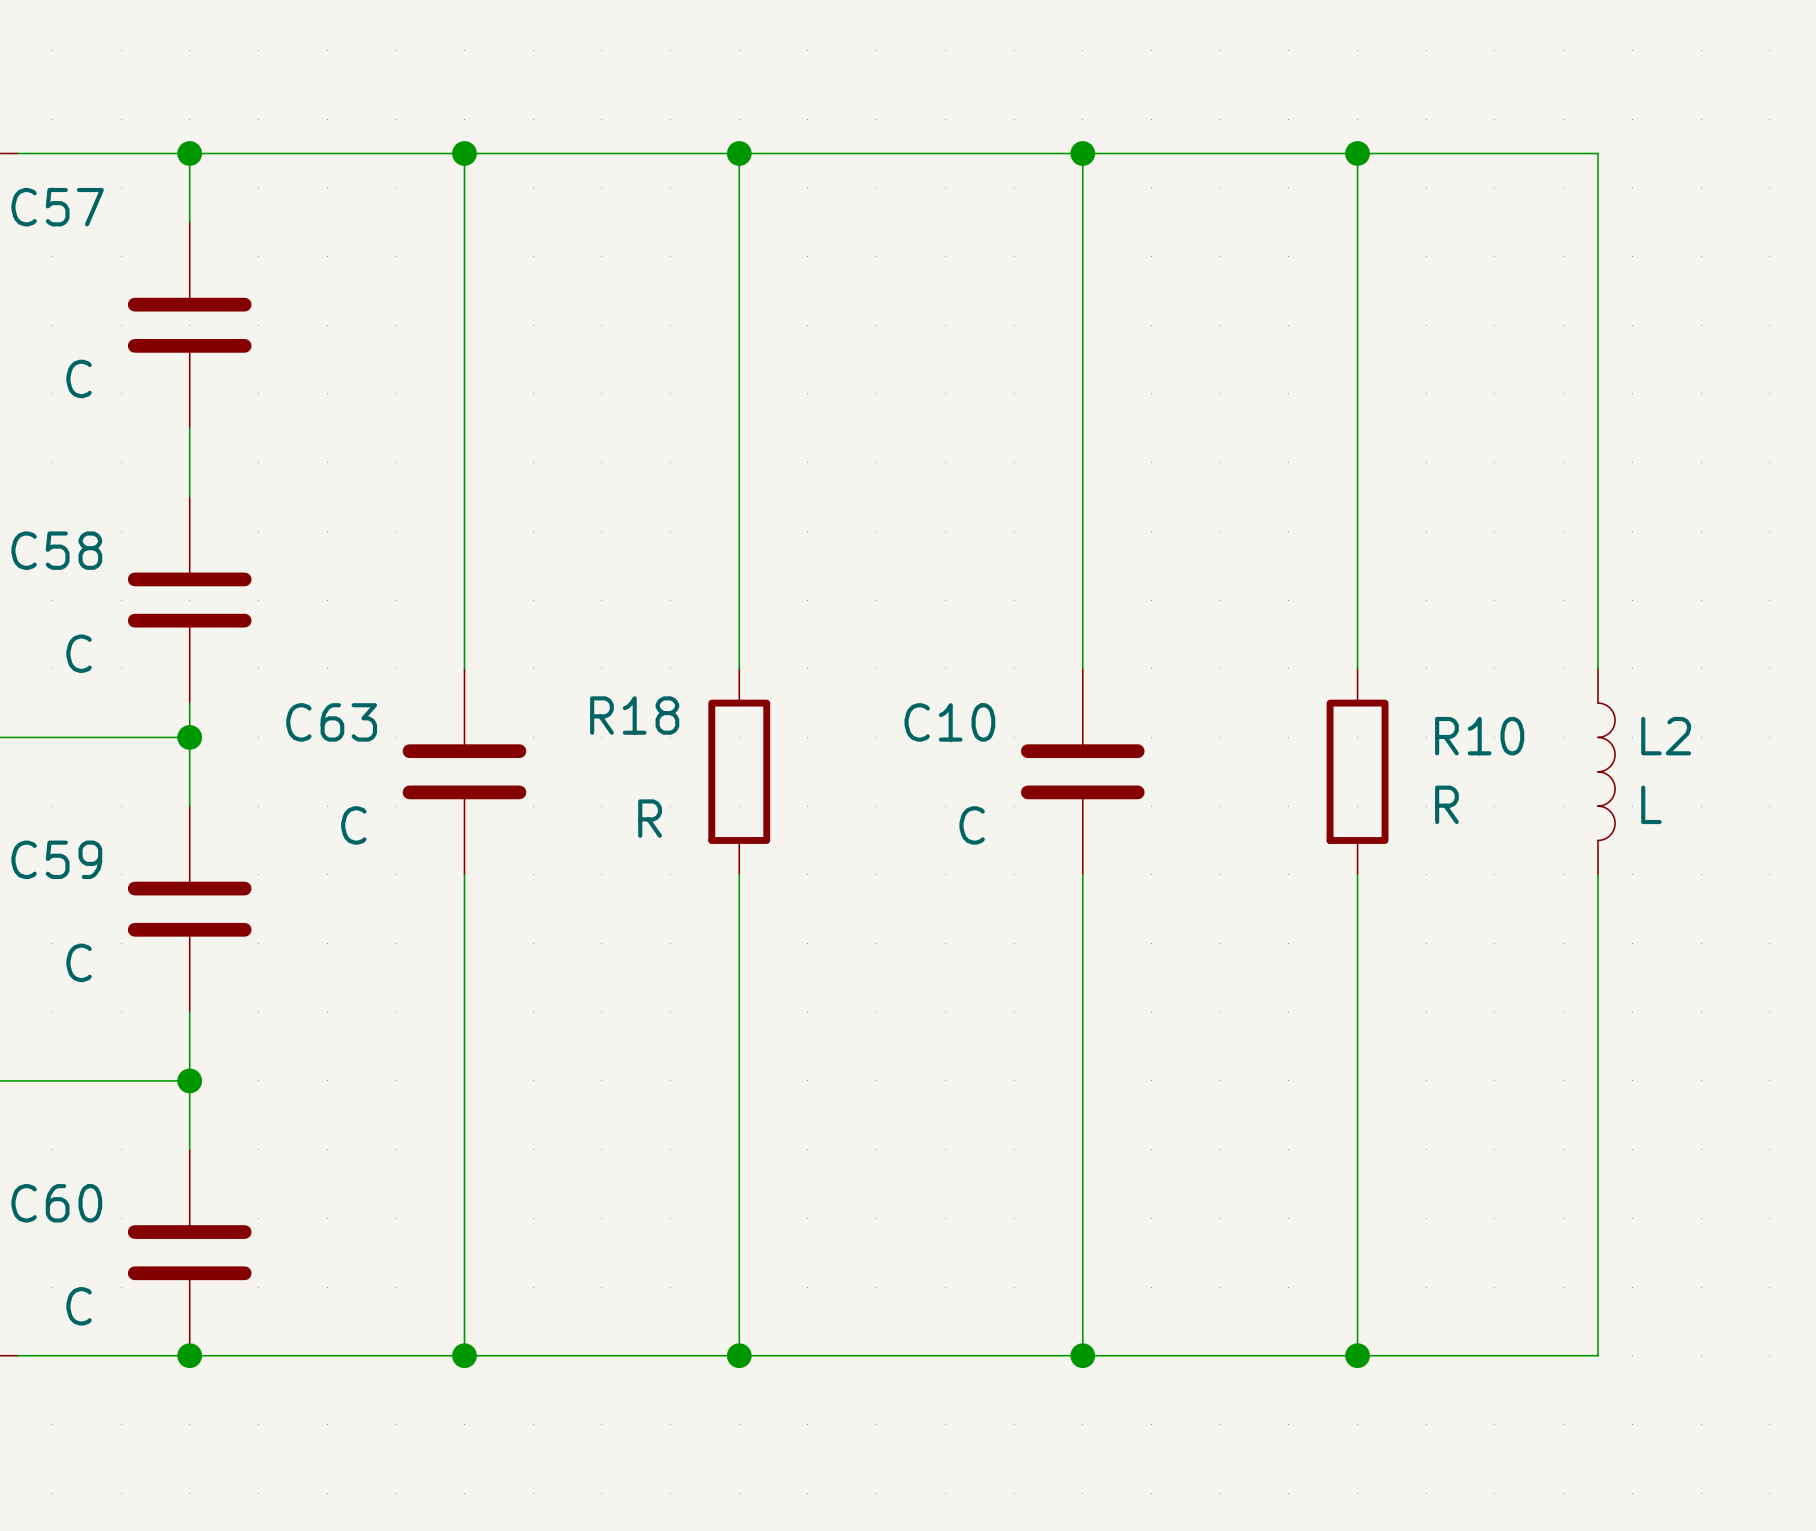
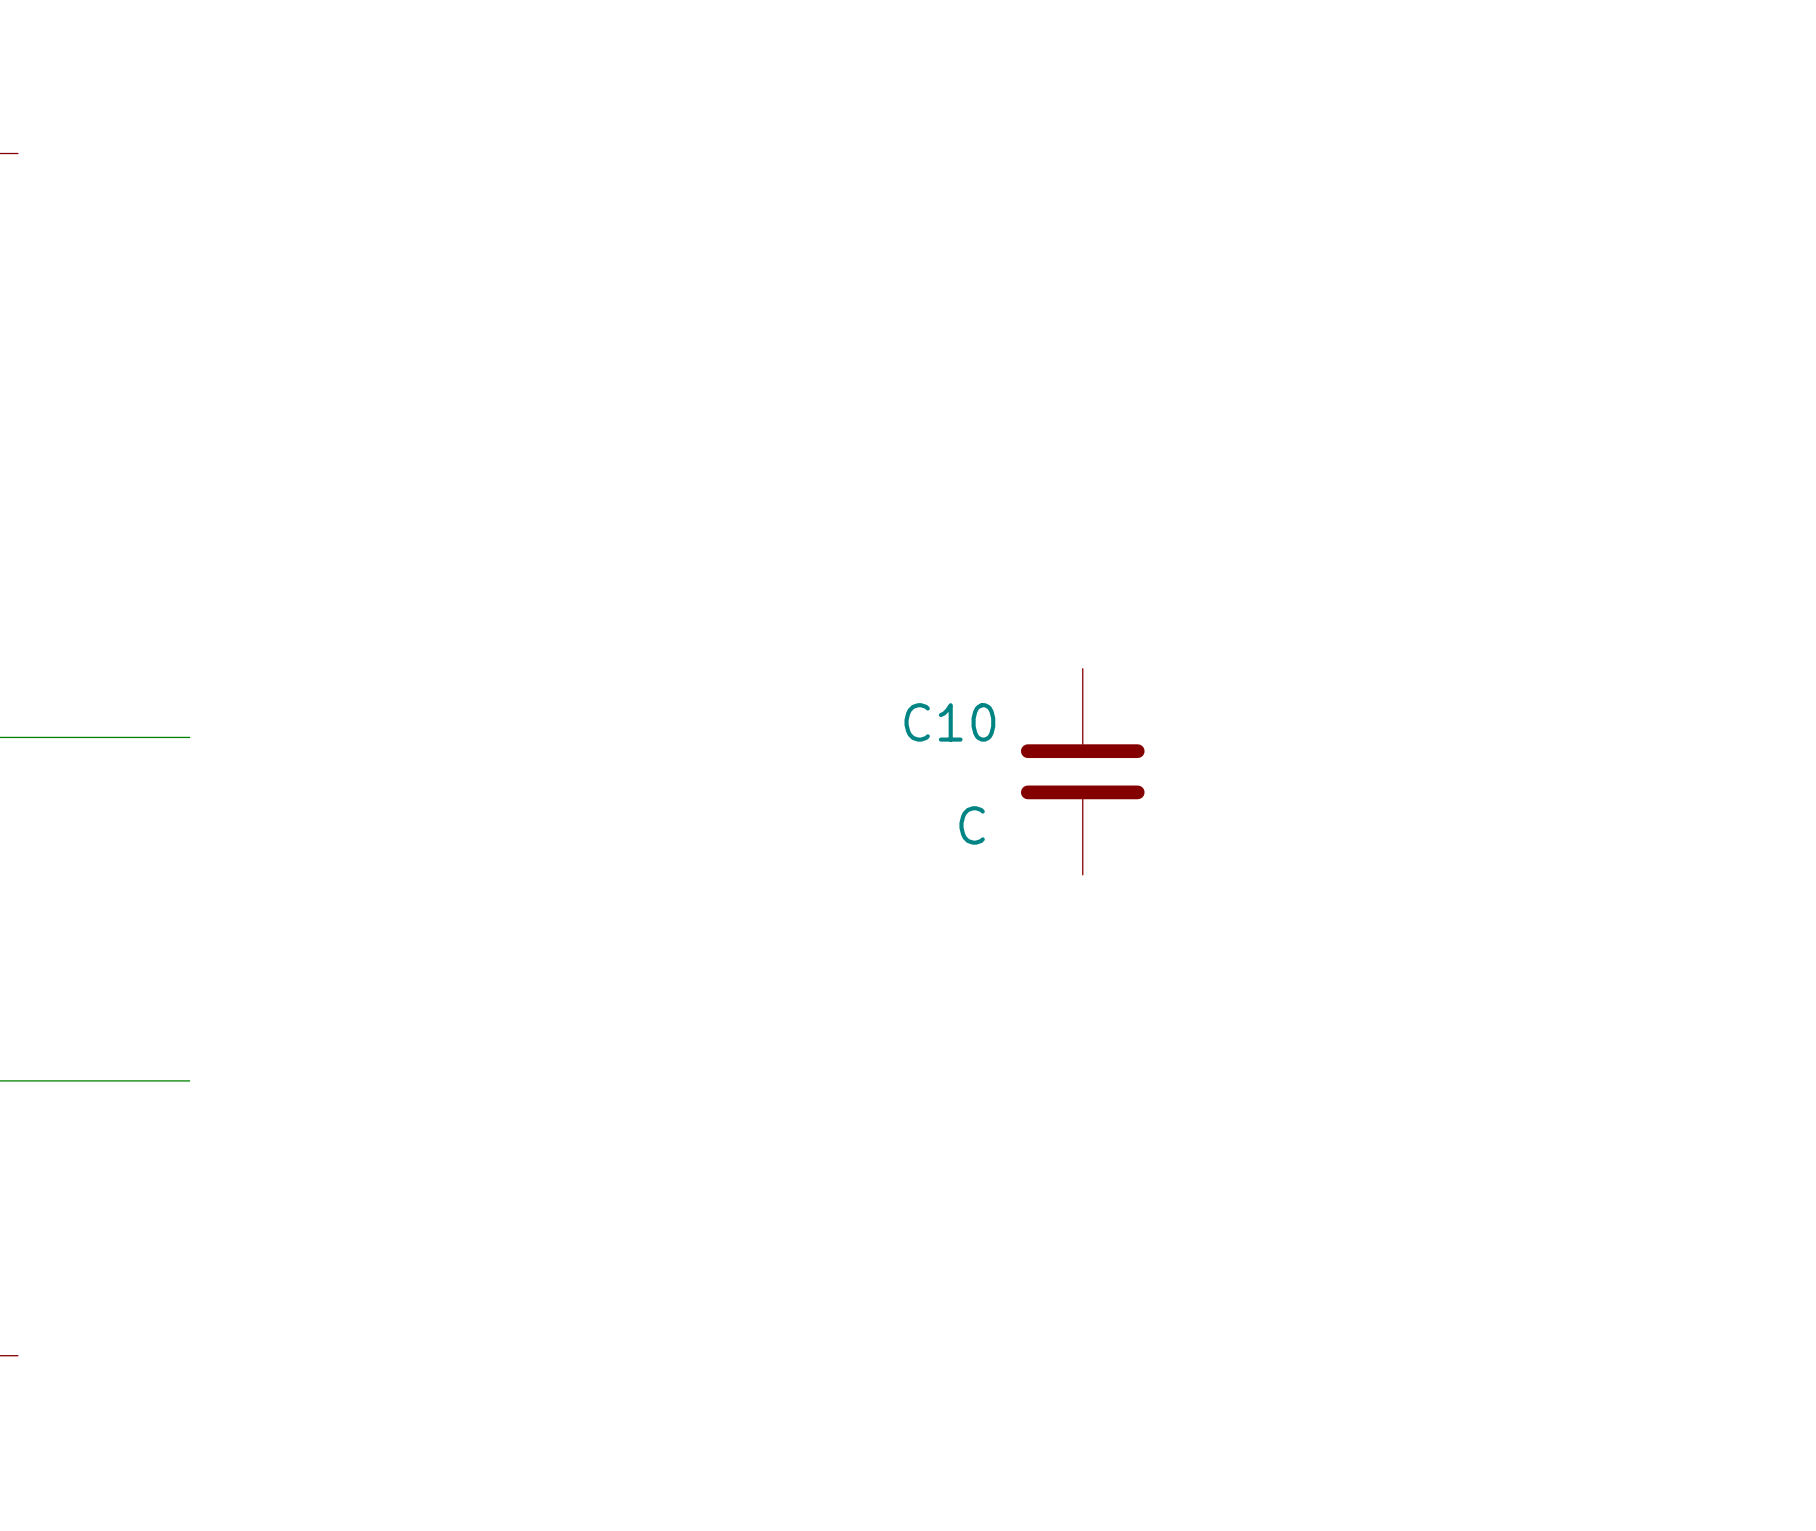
wire: (17, 153) (1597, 153) (1597, 668) -> none
wire: (189, 153) (189, 222) -> none
junction: (189, 153) -> none
wire: (464, 153) (464, 668) -> none
junction: (464, 153) -> none
wire: (739, 153) (739, 668) -> none
junction: (739, 153) -> none
wire: (1082, 153) (1082, 668) -> none
junction: (1082, 153) -> none
wire: (1357, 153) (1357, 668) -> none
junction: (1357, 153) -> none
C57: C (189, 325) -> none
wire: (189, 428) (189, 496) -> none
C58: C (189, 600) -> none
wire: (189, 703) (189, 806) -> none
junction: (189, 737) -> none
C63: C (464, 771) -> none
R18: R (739, 771) -> none
R10: R (1357, 771) -> none
L2: L (1606, 771) -> none
wire: (464, 874) (464, 1355) -> none
wire: (739, 874) (739, 1355) -> none
wire: (1082, 874) (1082, 1355) -> none
wire: (1357, 874) (1357, 1355) -> none
wire: (1597, 874) (1597, 1355) (17, 1355) -> none
C59: C (189, 909) -> none
wire: (189, 1012) (189, 1149) -> none
junction: (189, 1080) -> none
C60: C (189, 1252) -> none
junction: (189, 1355) -> none
junction: (464, 1355) -> none
junction: (739, 1355) -> none
junction: (1082, 1355) -> none
junction: (1357, 1355) -> none

